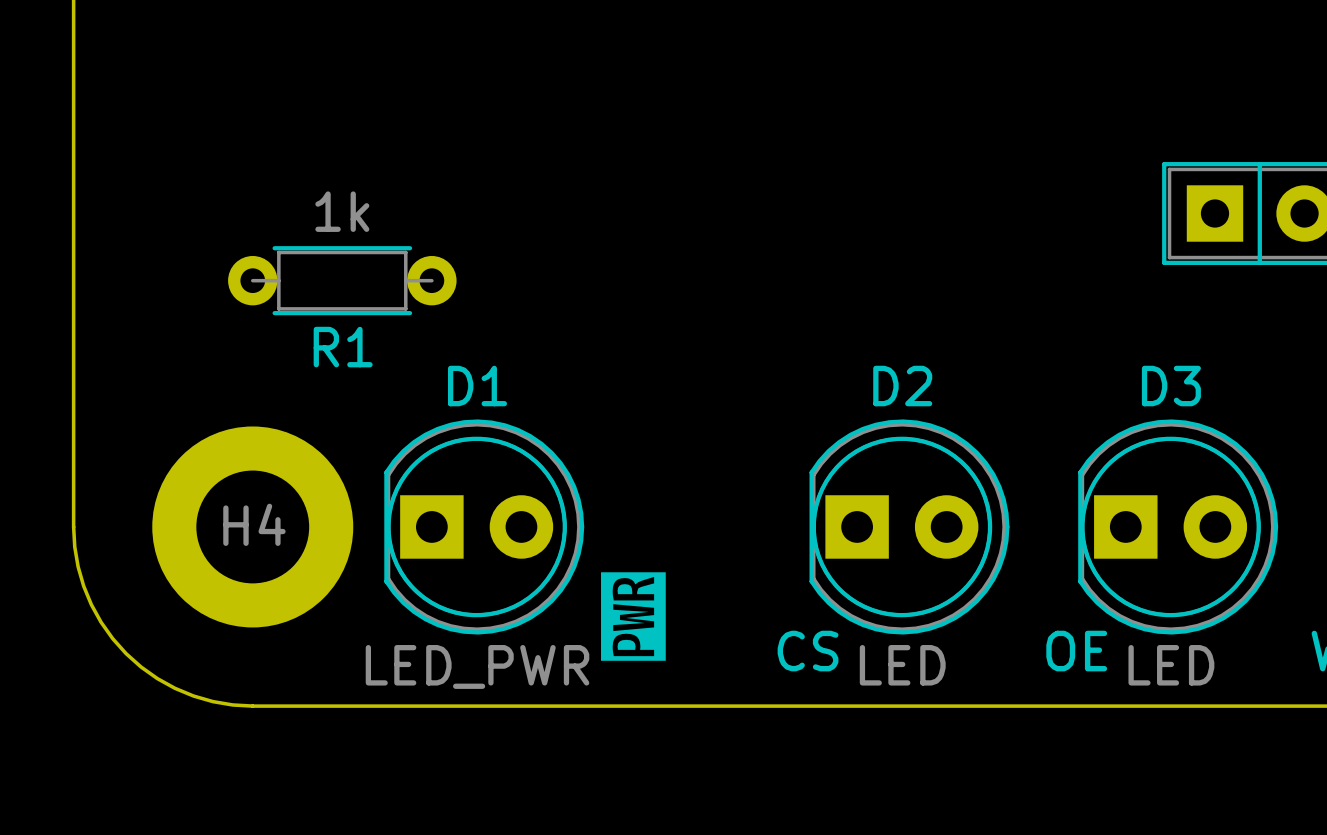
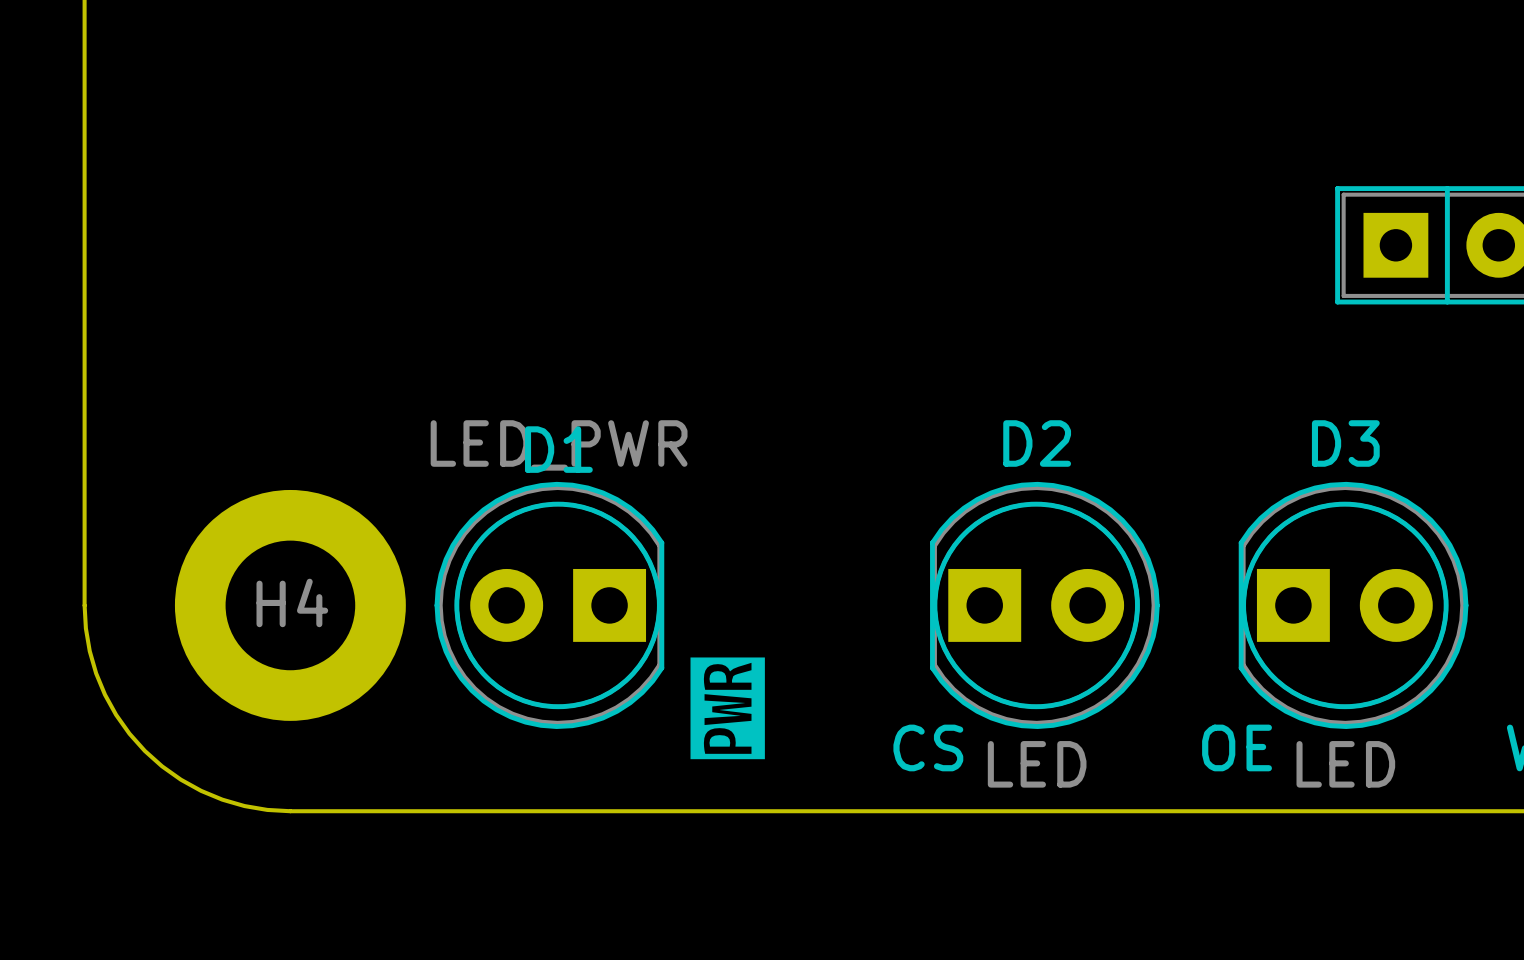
R1: 1k (342, 280) -> none
D1 rotation: 0° (484, 526) -> 180° (549, 605)

